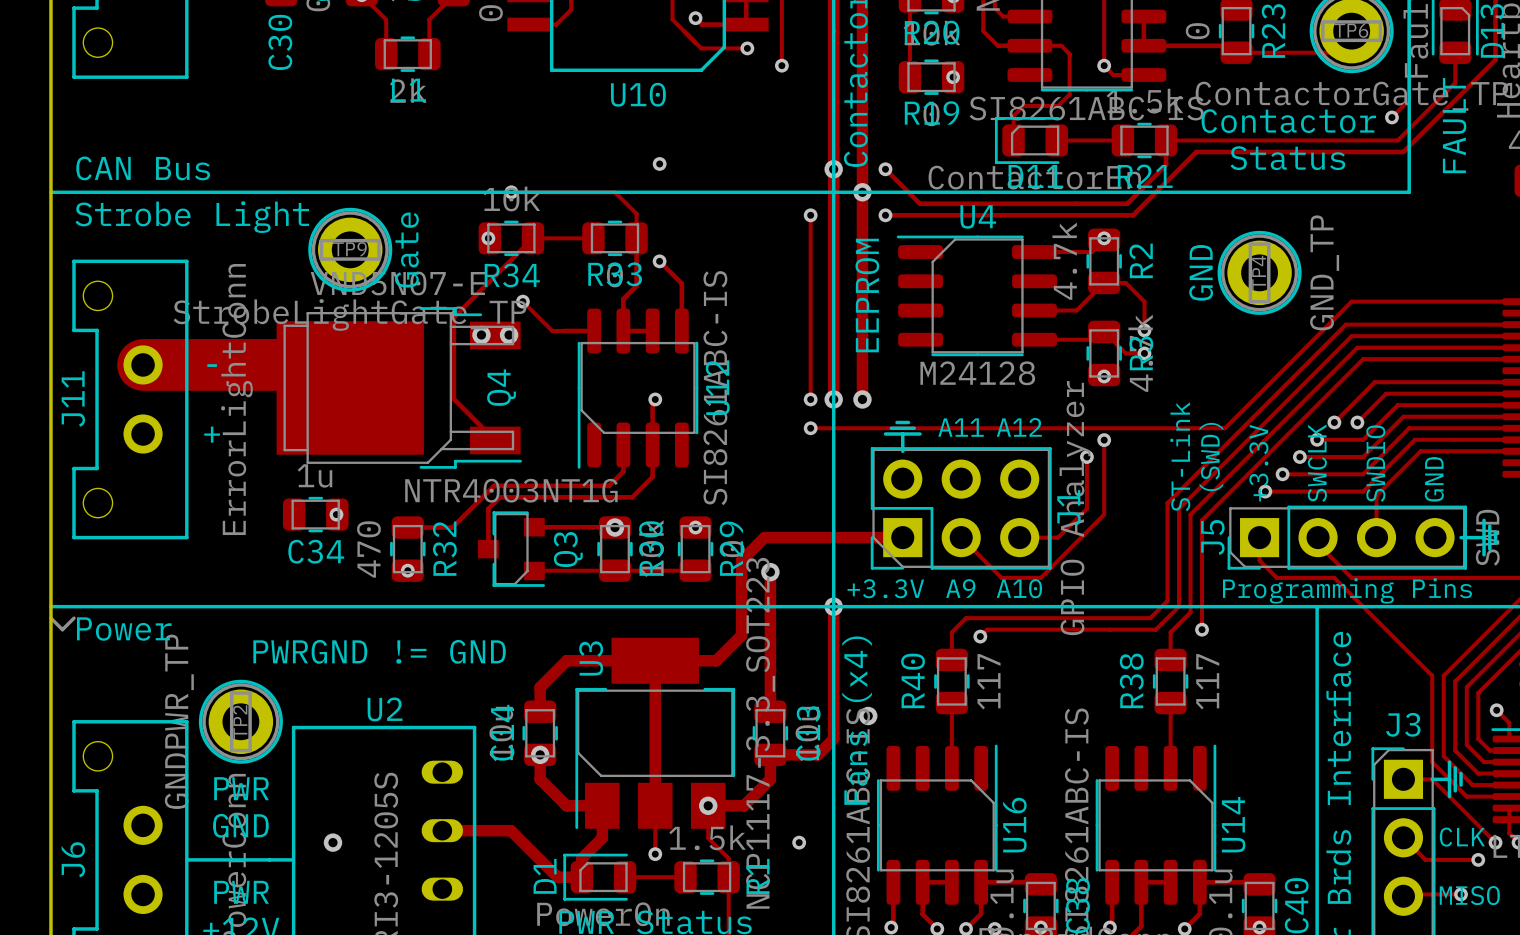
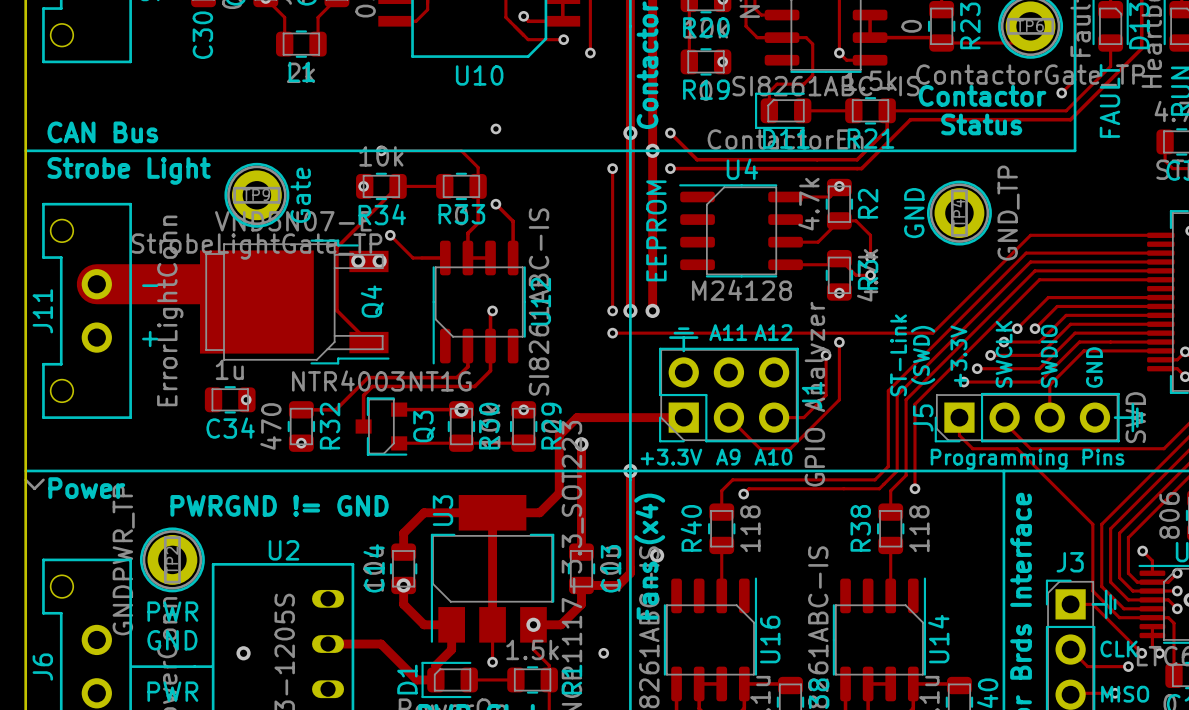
R40 value: 117 (989, 681) -> 118 (750, 528)
R38 value: 117 (1207, 681) -> 118 (919, 528)

